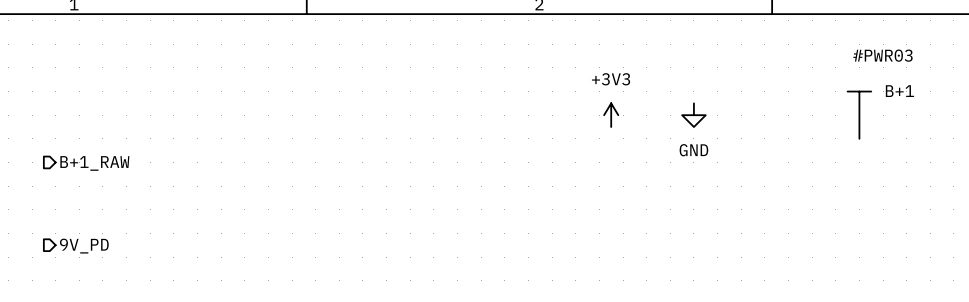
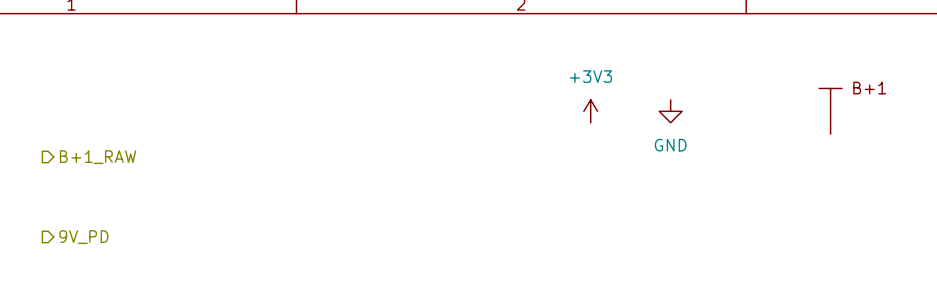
#PWR03 name: #PWR03 (882, 55) -> none

